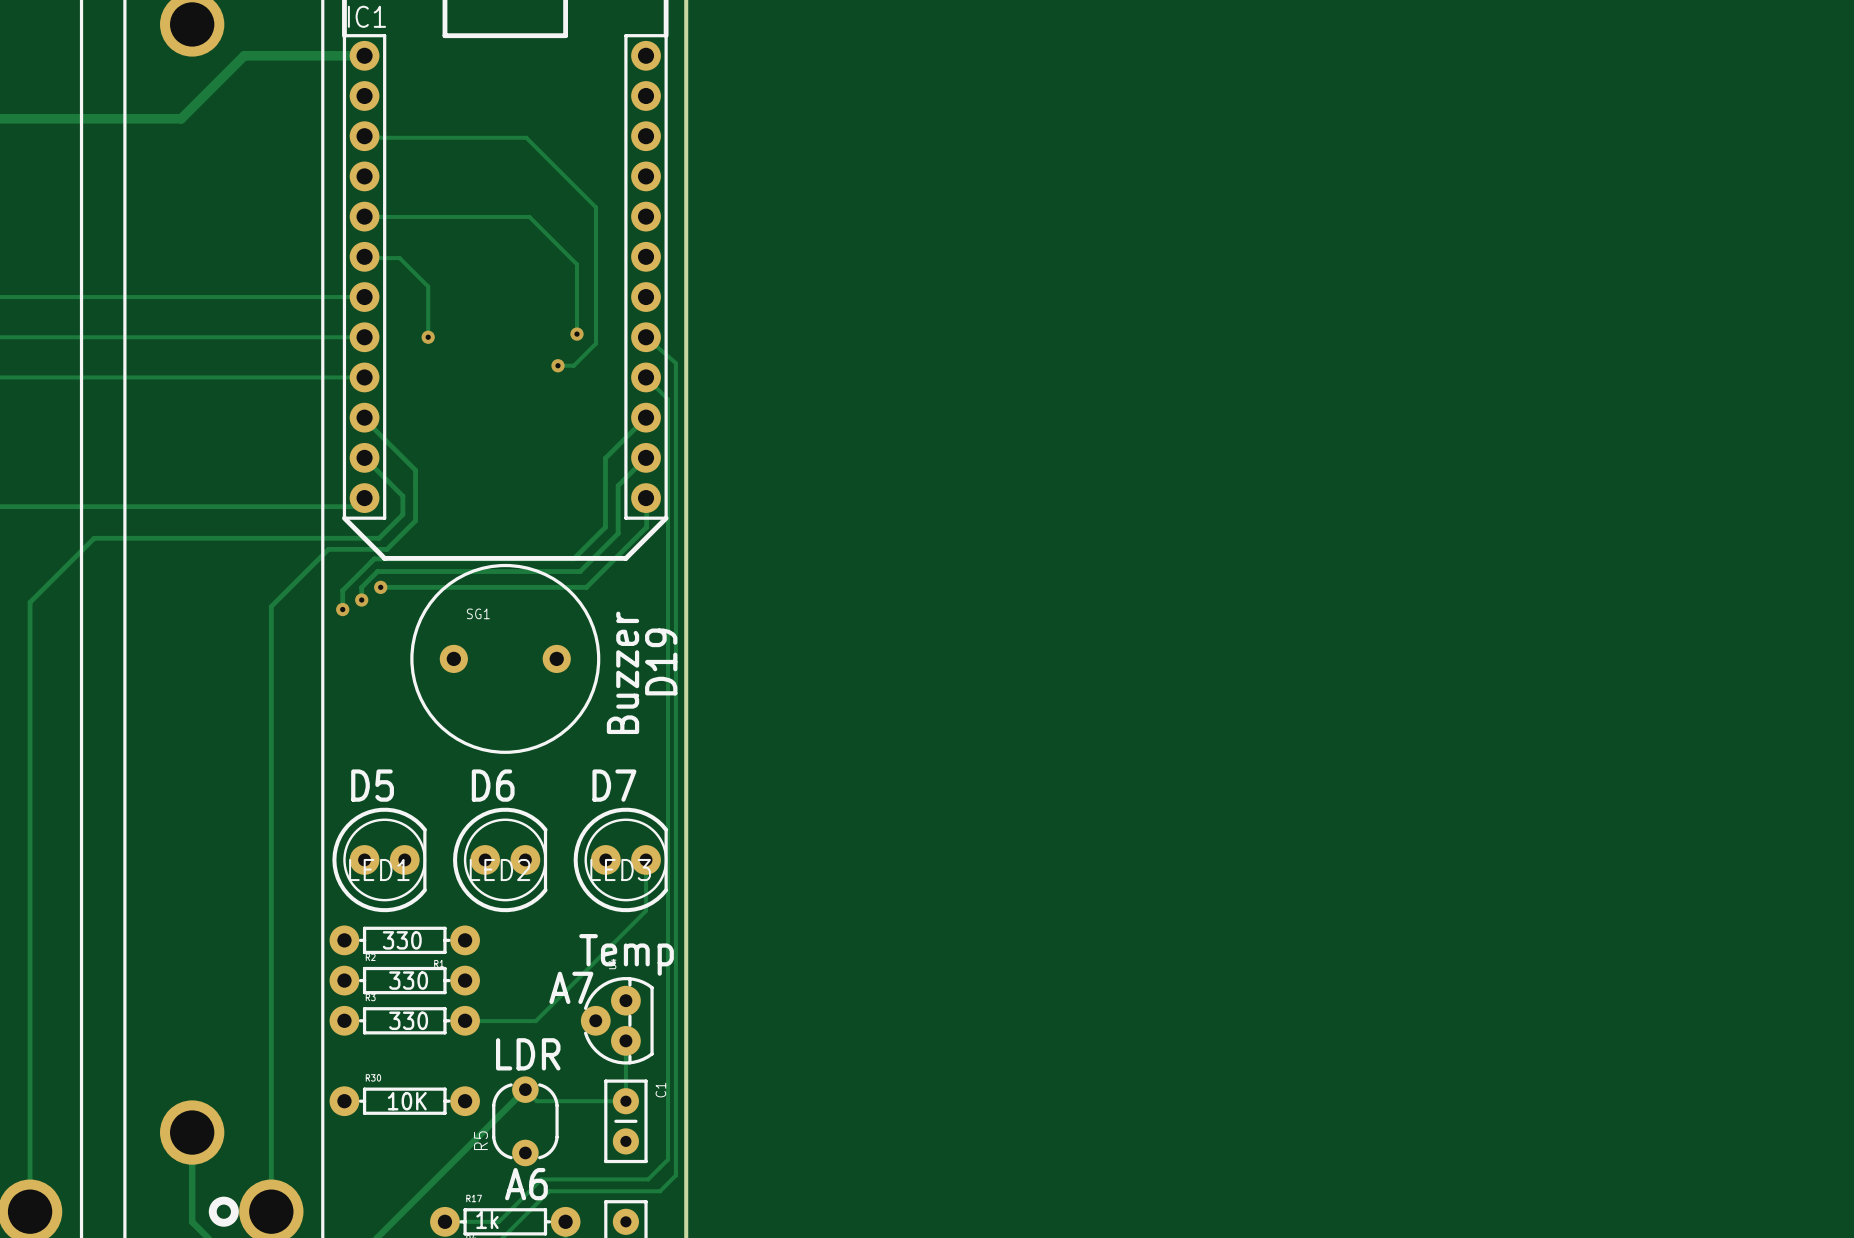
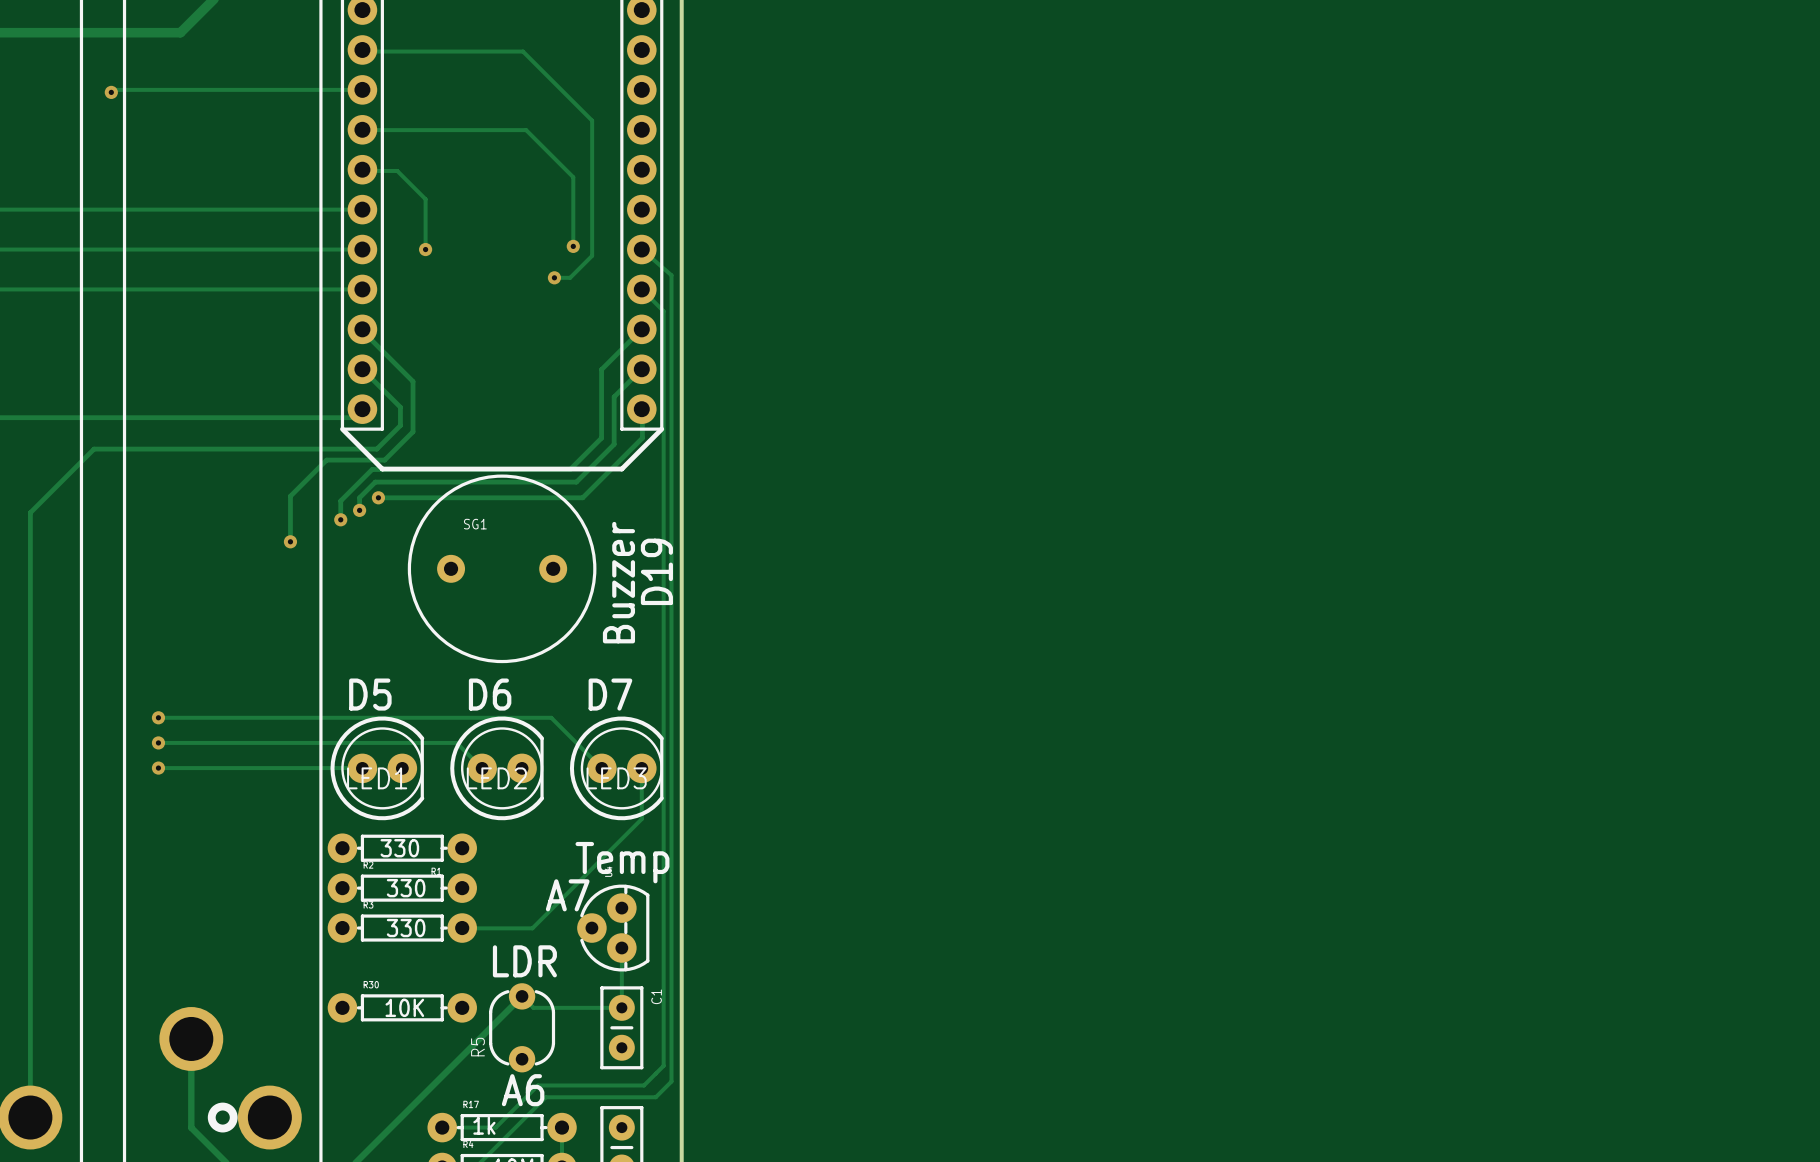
track: none -> (362, 89) (113, 89) (111, 92)
via: none -> (111, 92)
track: (292, 585) (271, 606) (271, 1211) -> (290, 496) (290, 541)
via: none -> (290, 541)
track: none -> (158, 717) (551, 717) (601, 768)
via: none -> (158, 717)
track: none -> (158, 742) (456, 742) (482, 768)
via: none -> (158, 742)
track: none -> (158, 768) (362, 768)
via: none -> (158, 768)

